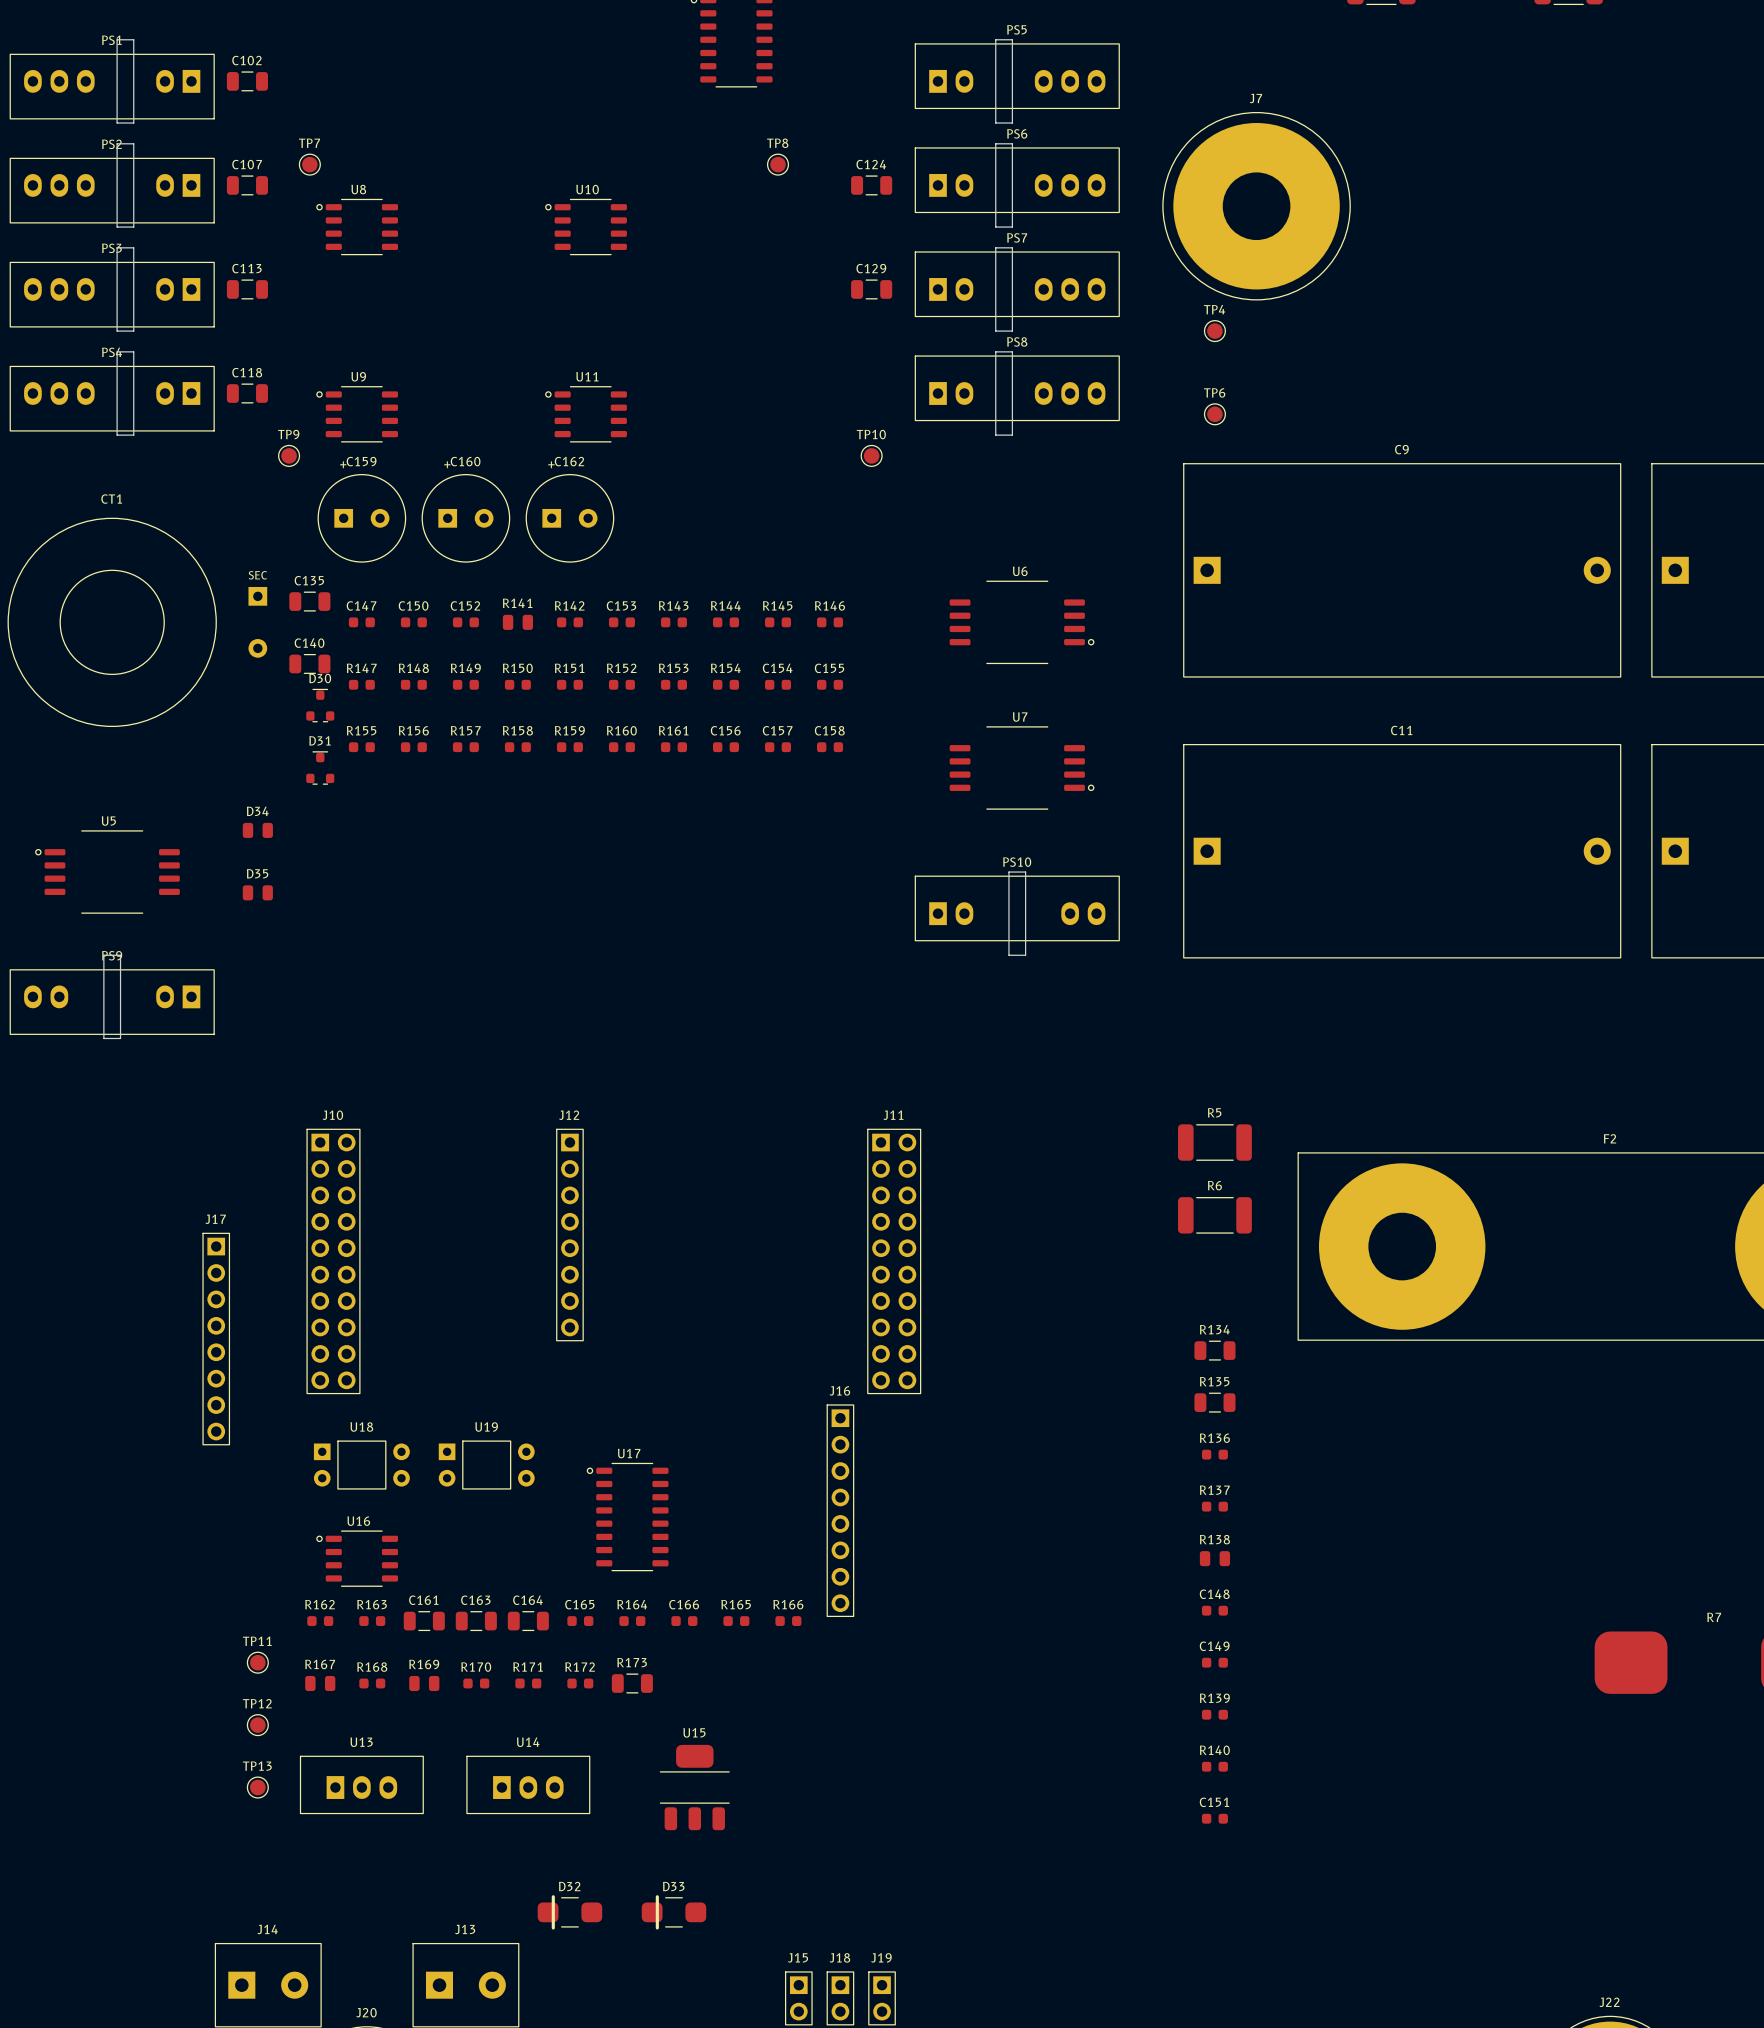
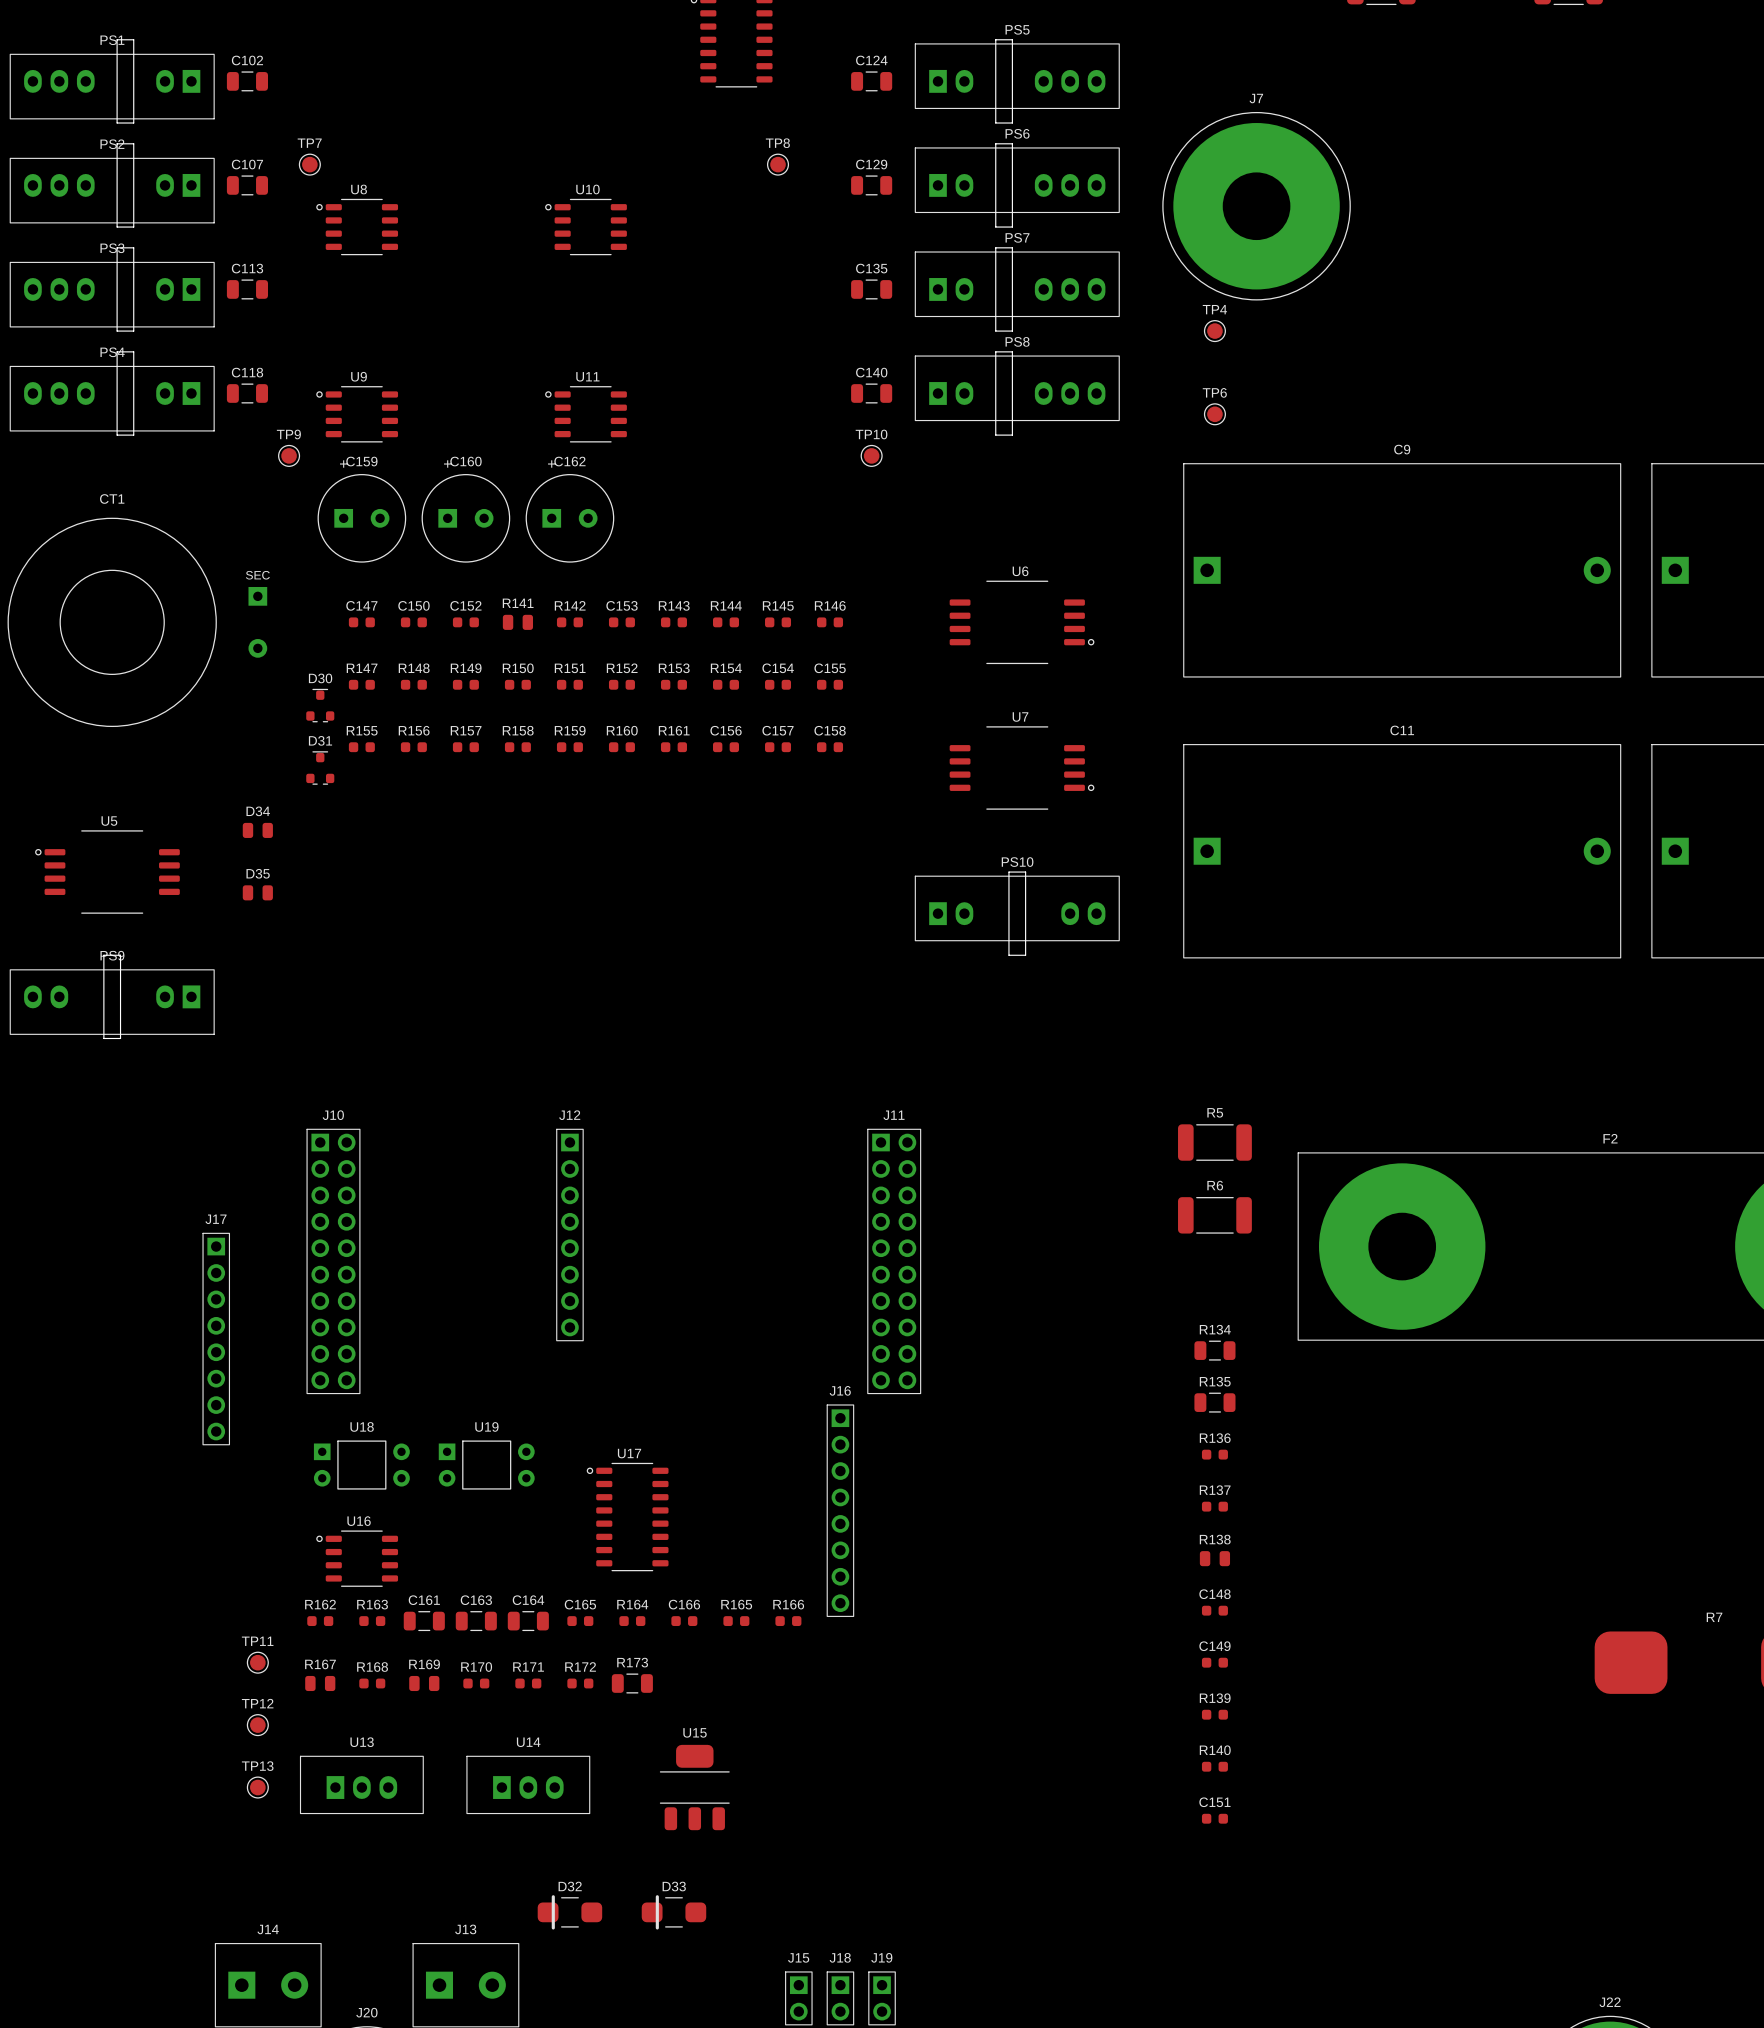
C124: none -> (871, 81)
C124 name: C124 (871, 164) -> C129 (871, 164)
C129 name: C129 (871, 268) -> C135 (871, 268)
C135: (309, 601) -> none
C140 position: (309, 663) -> (871, 393)

